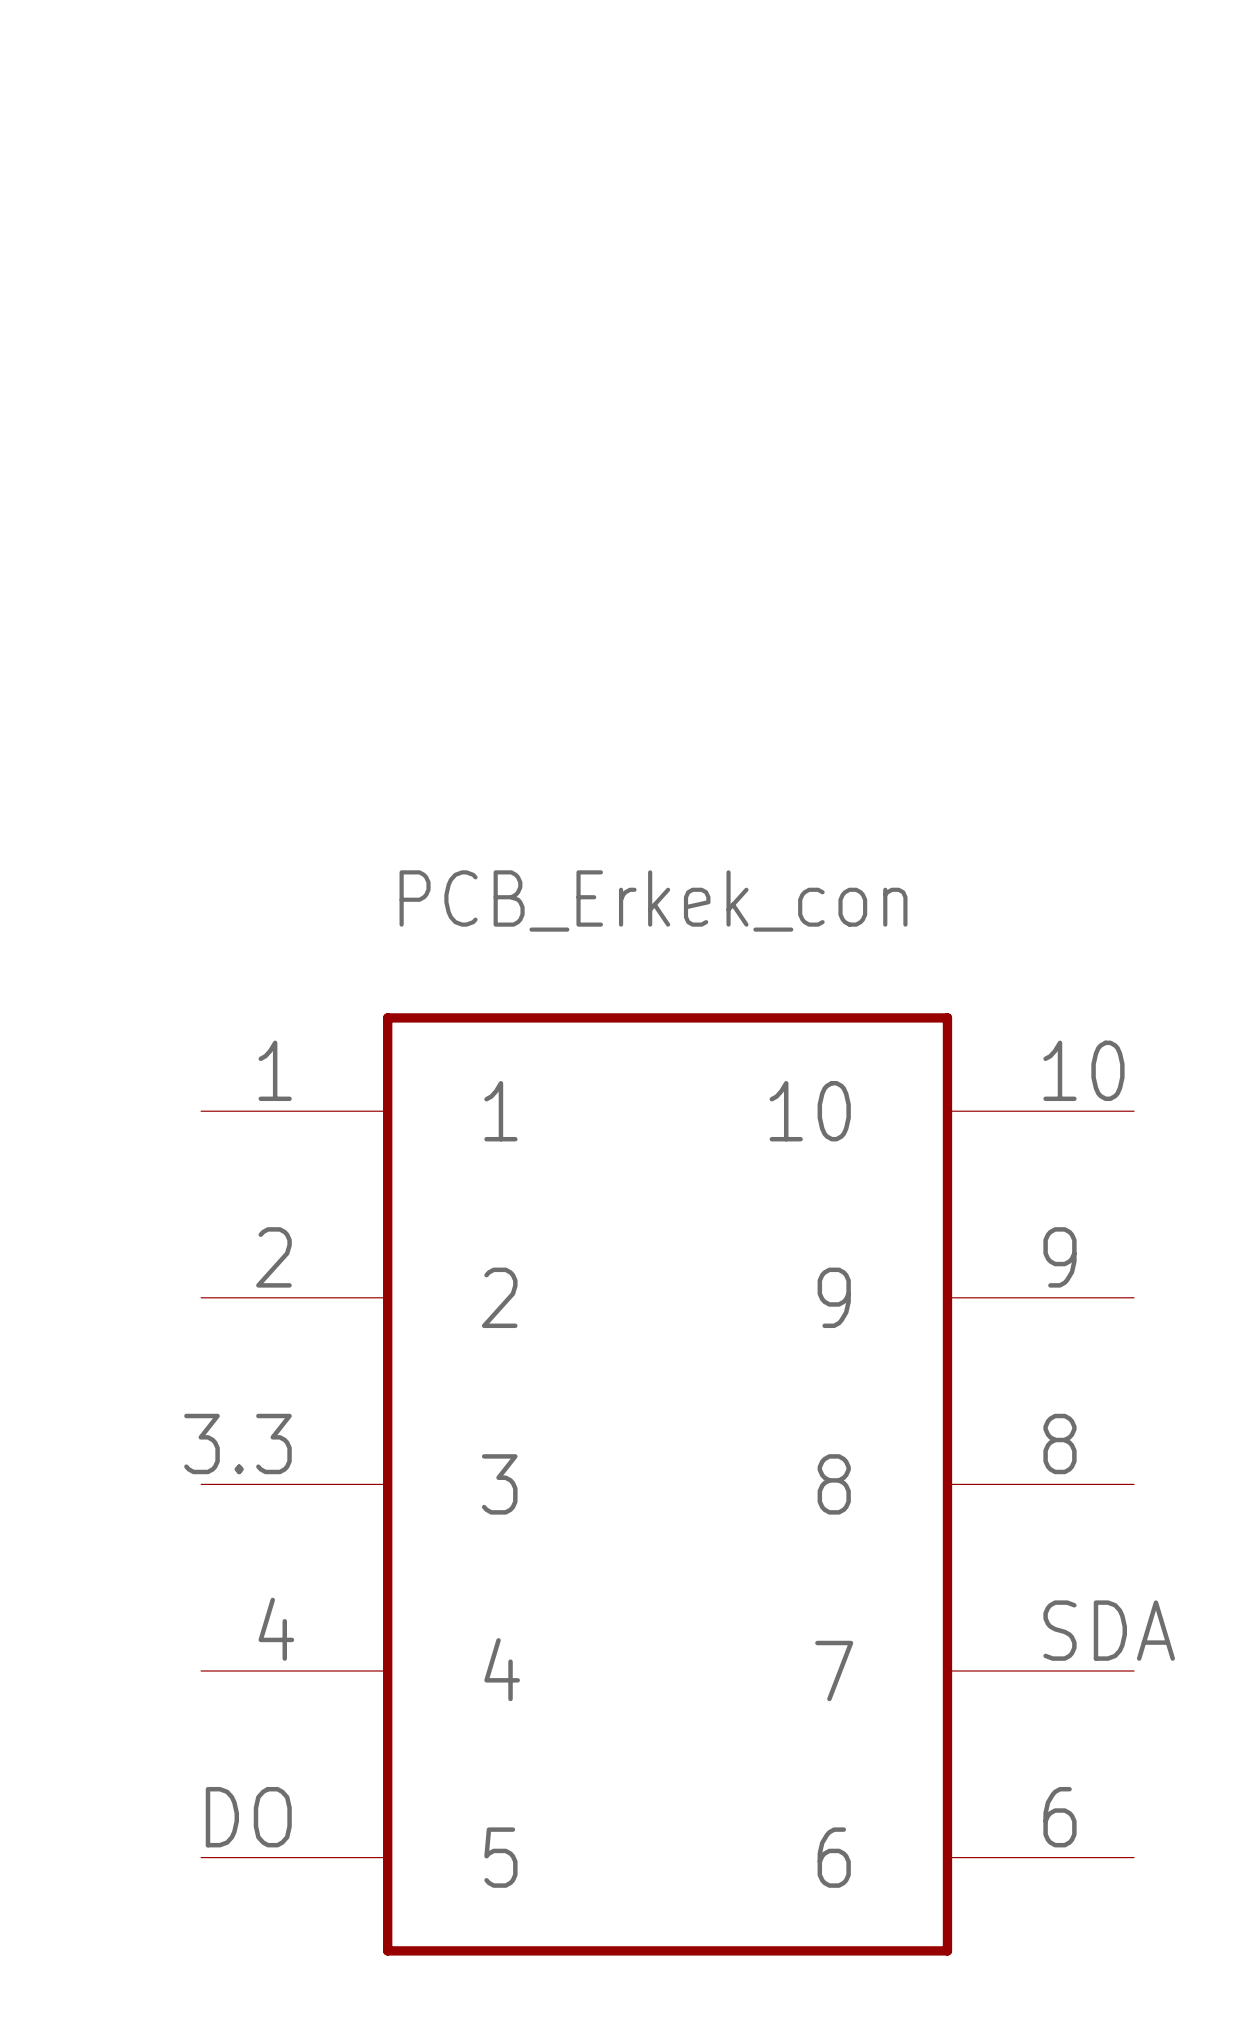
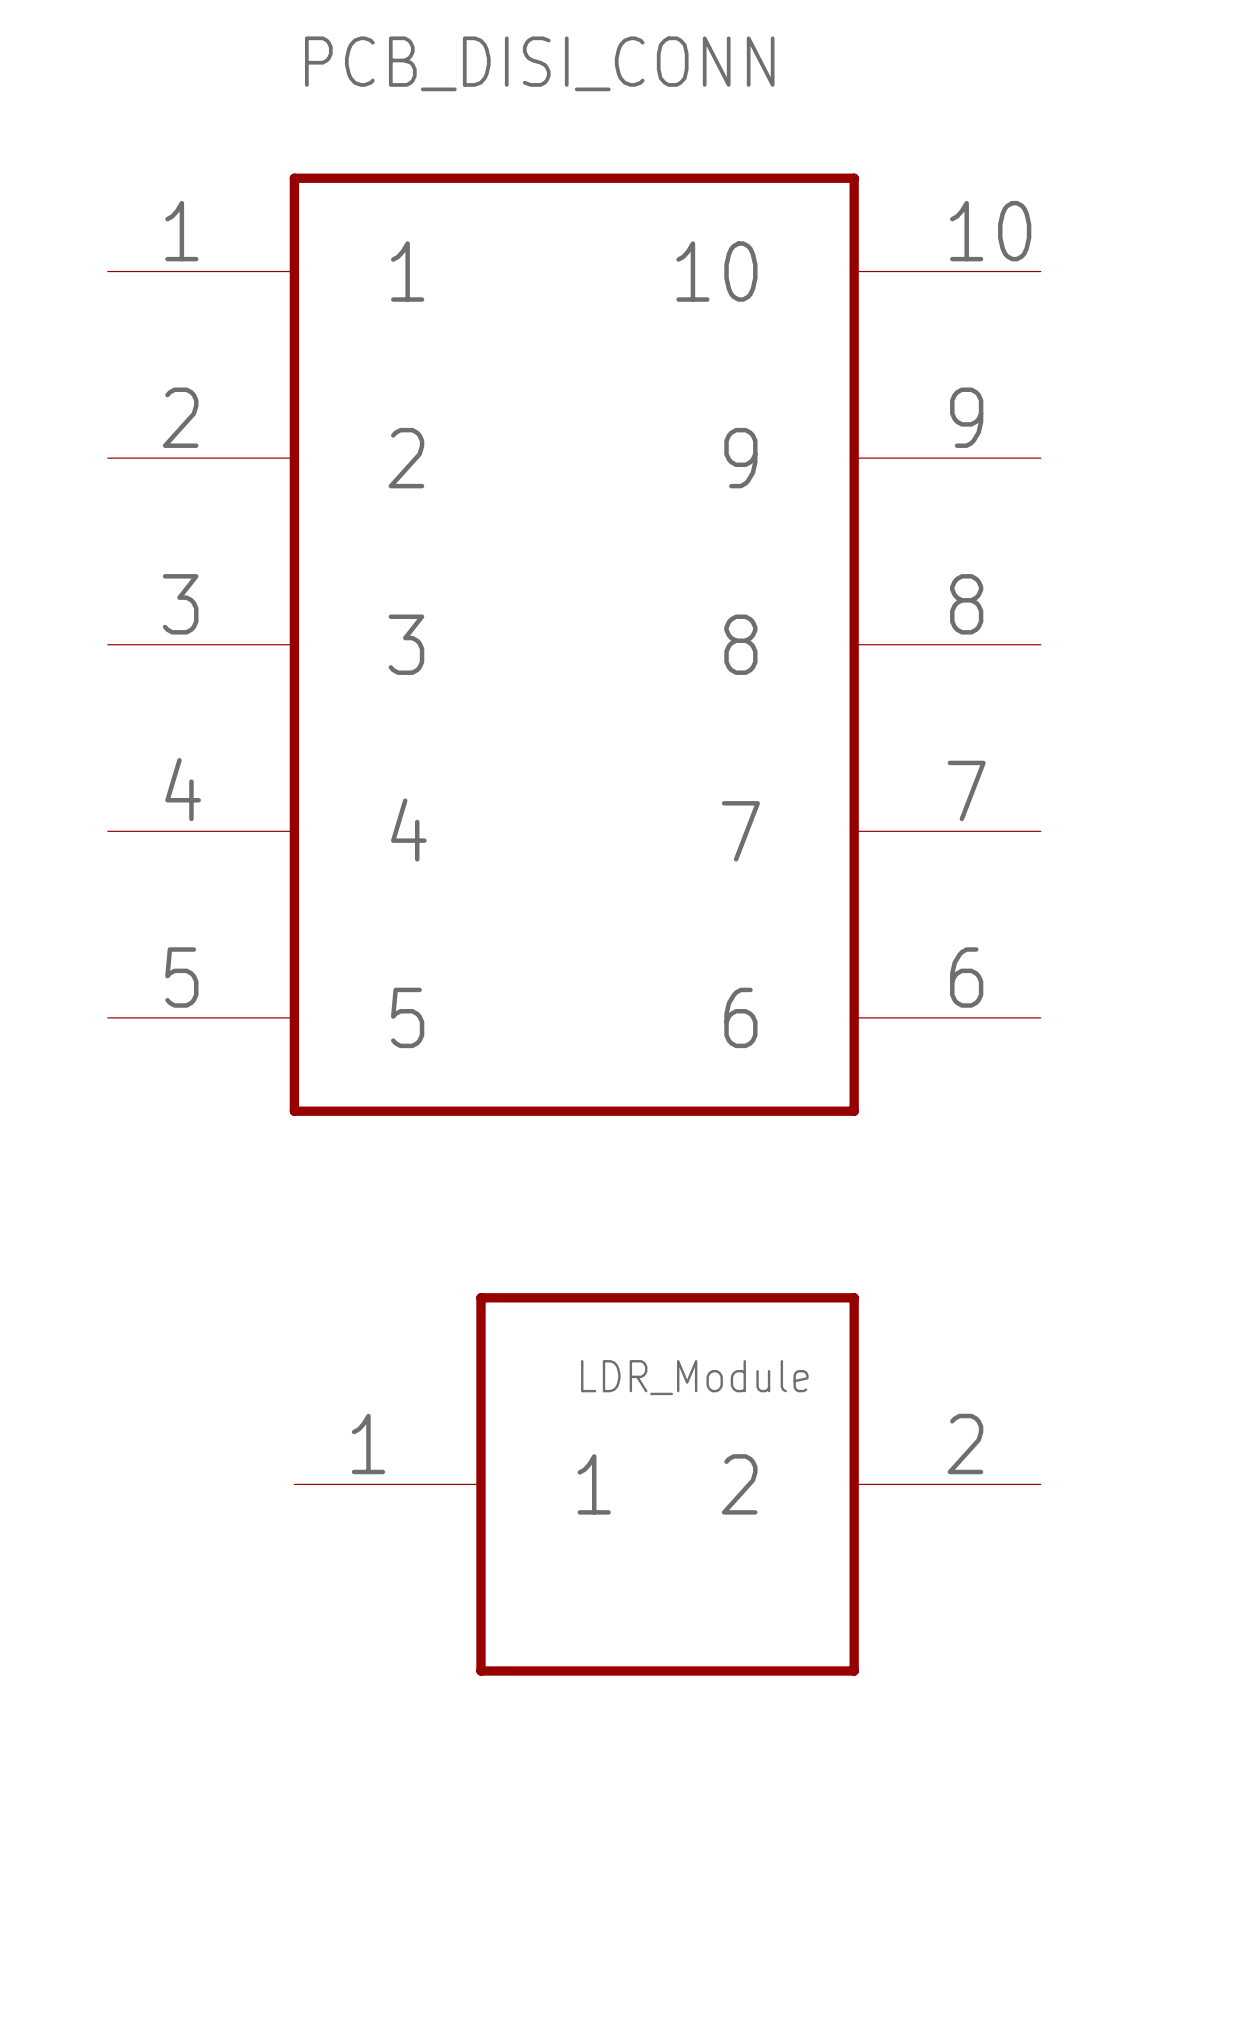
part: none -> (574, 644)
part symbol: [201, 1013, 1135, 1956] -> [294, 1293, 1041, 1676]

